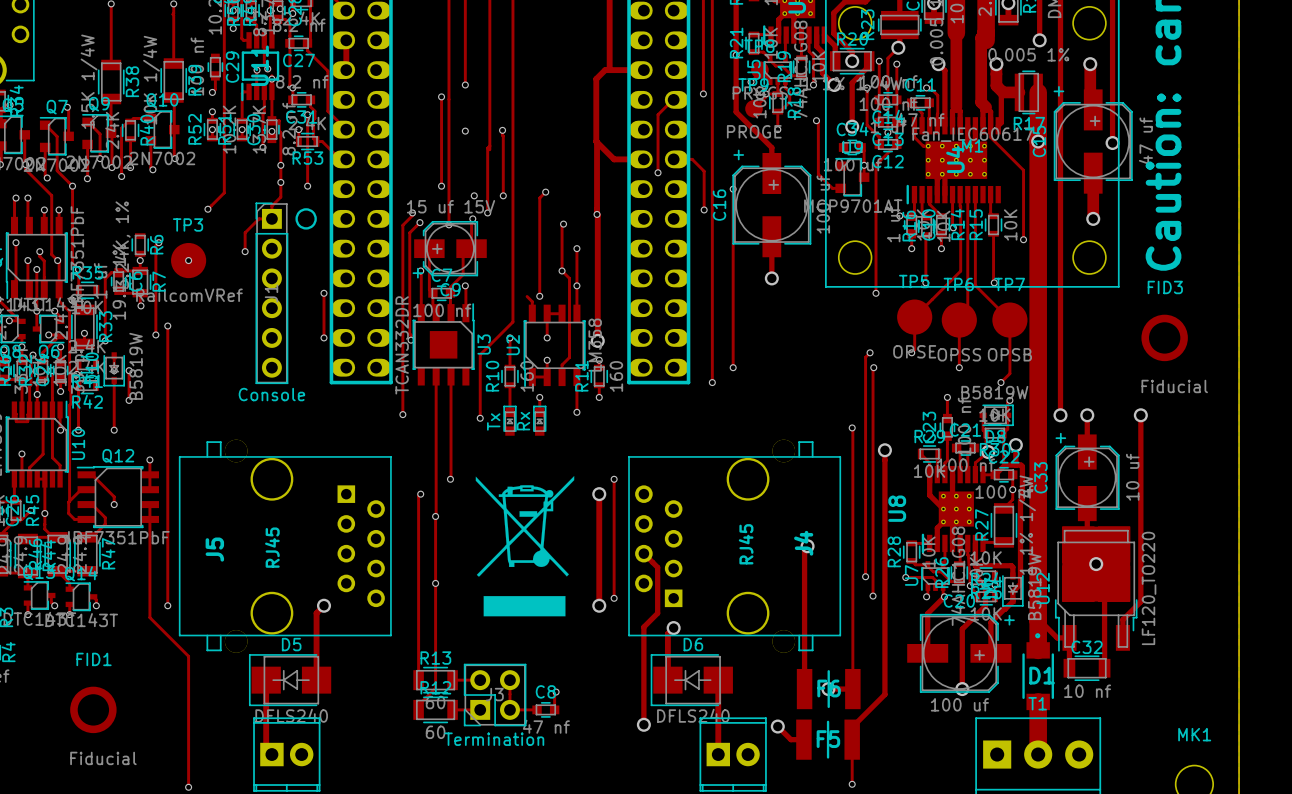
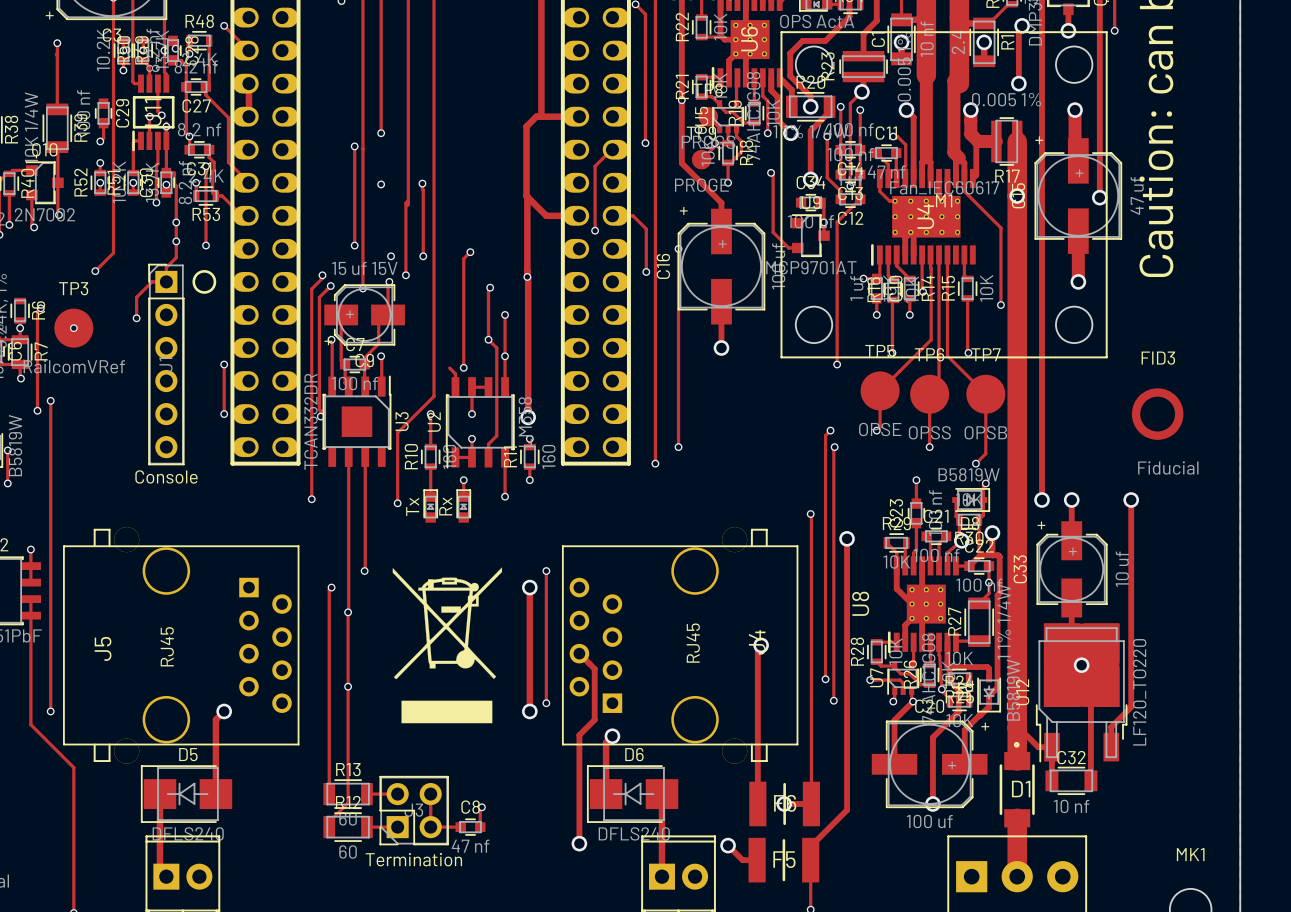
T1 name: T1 (1037, 703) -> none

